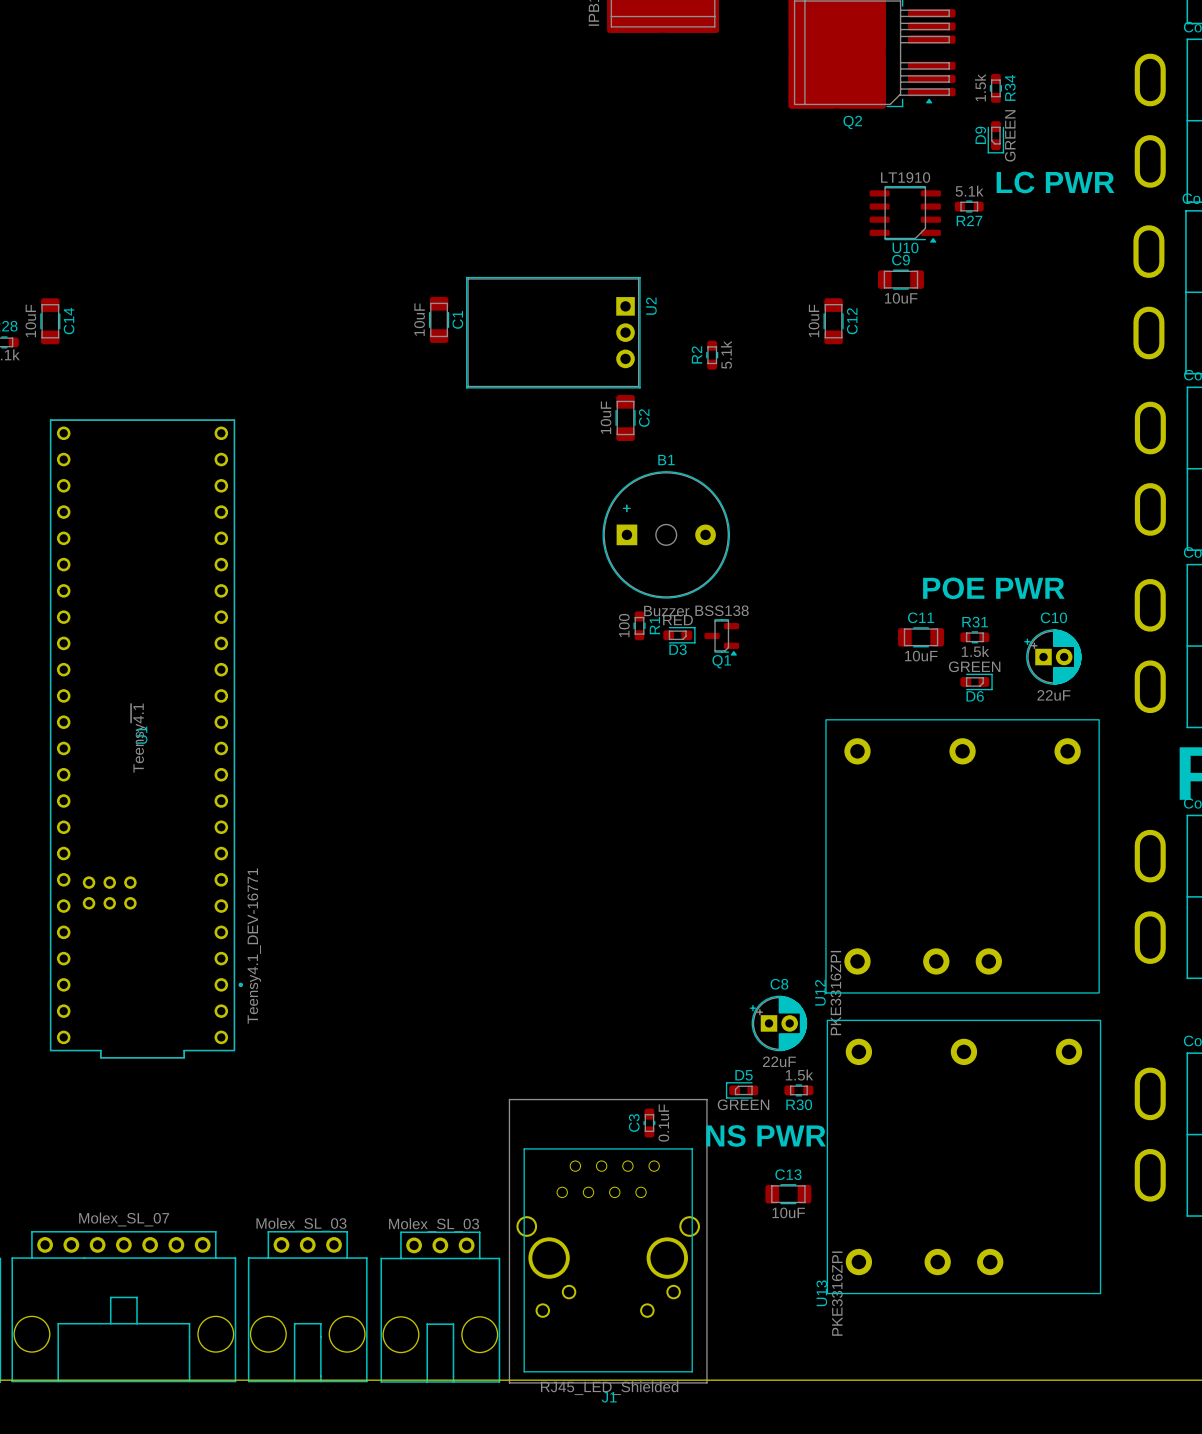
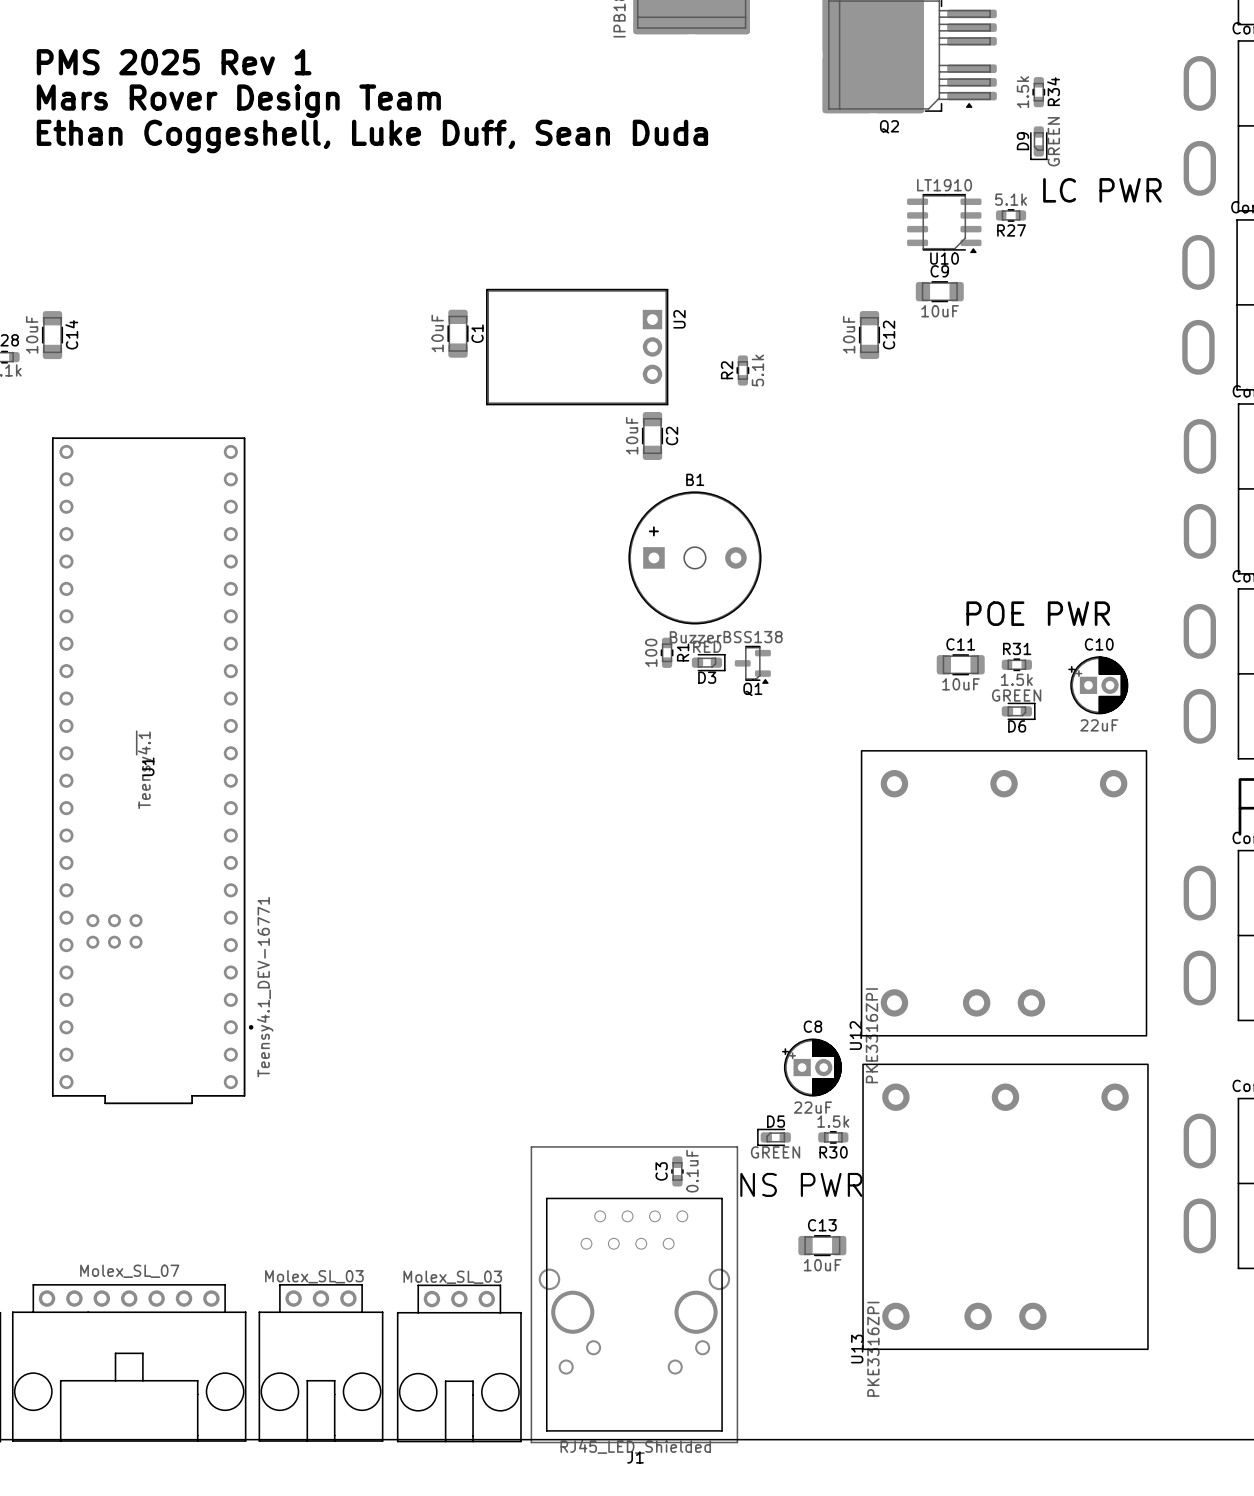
text: none -> PMS 2025 Rev 1 (174, 62)
text: none -> Mars Rover Design Team (238, 101)
text: none -> Ethan Coggeshell, Luke Duff, Sean Duda (372, 136)

